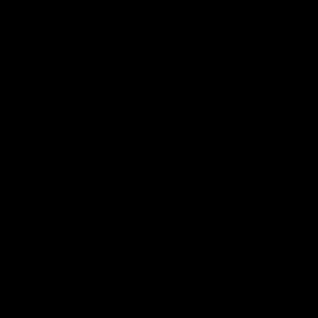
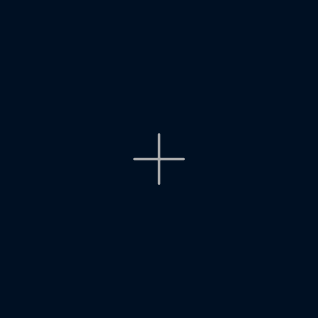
line: none -> (159, 134) (159, 183)
line: none -> (134, 159) (183, 159)

